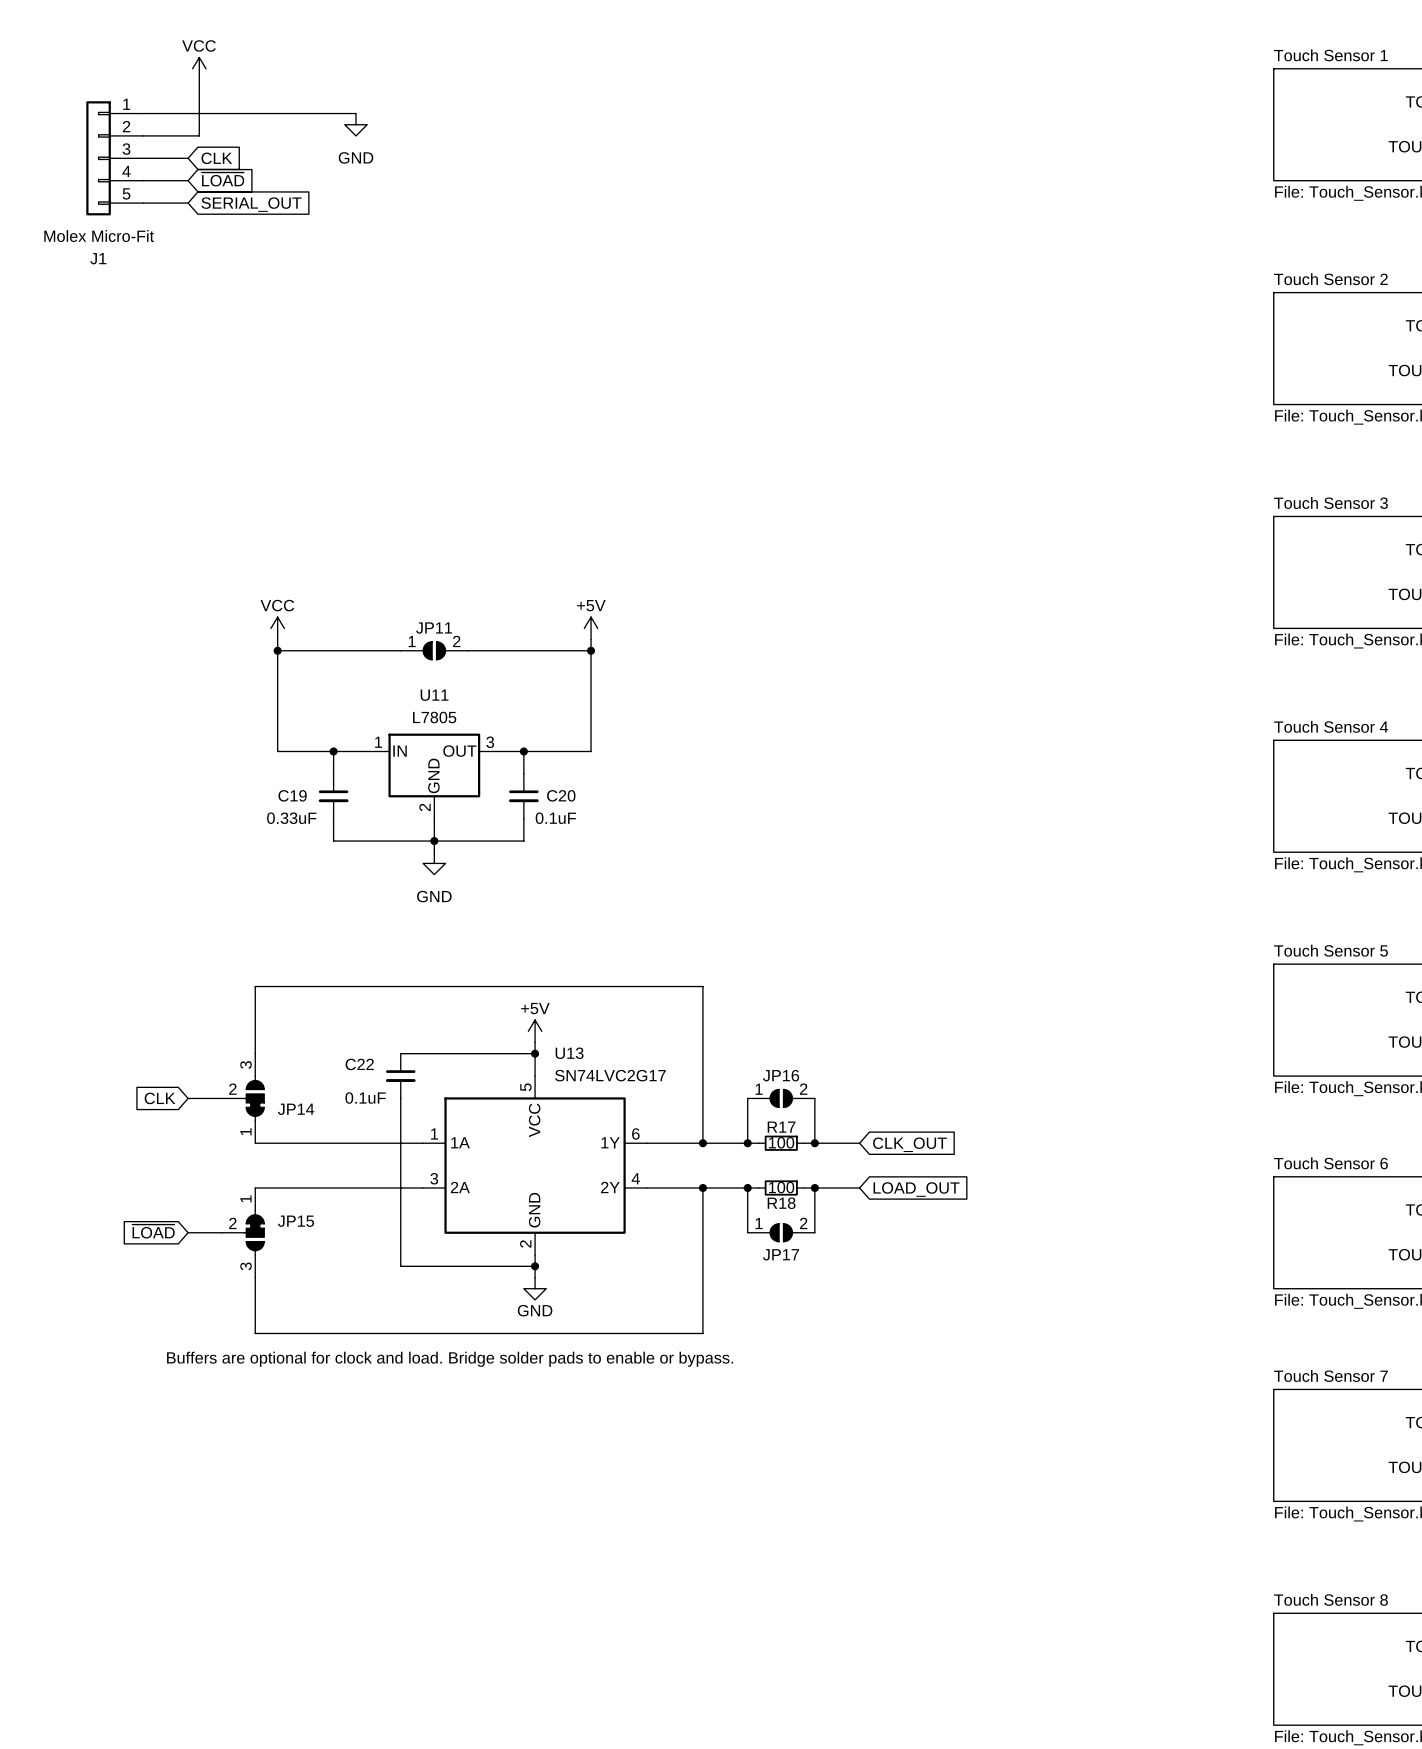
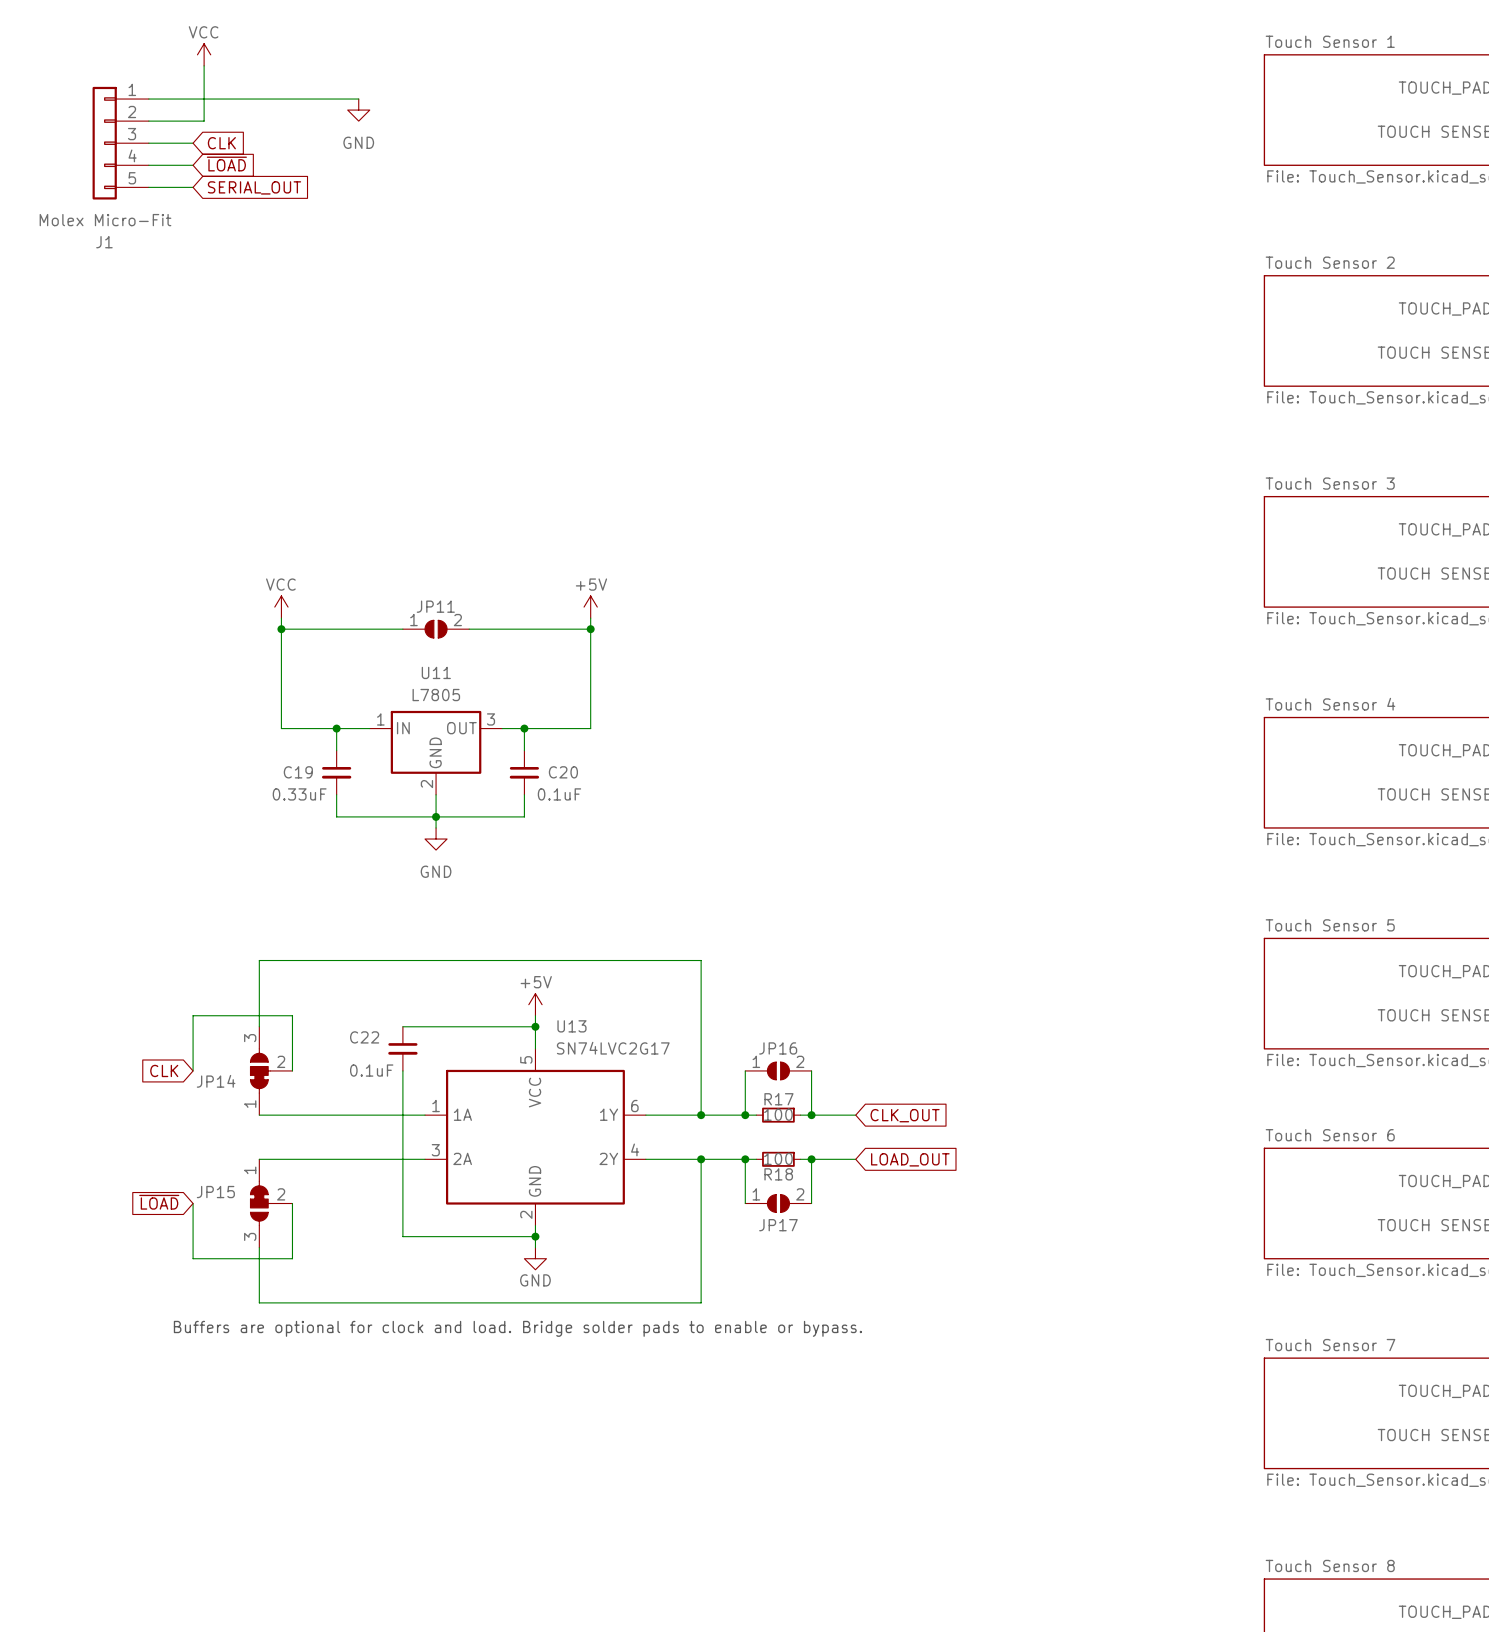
wire: (188, 1098) (221, 1098) -> (193, 1070) (193, 1015) (292, 1015) (292, 1070)
JP14 flip: as is (254, 1098) -> left-right (260, 1070)
wire: (188, 1232) (221, 1232) -> (193, 1203) (193, 1258) (292, 1258) (292, 1203)
JP15 flip: as is (254, 1232) -> left-right (260, 1203)

